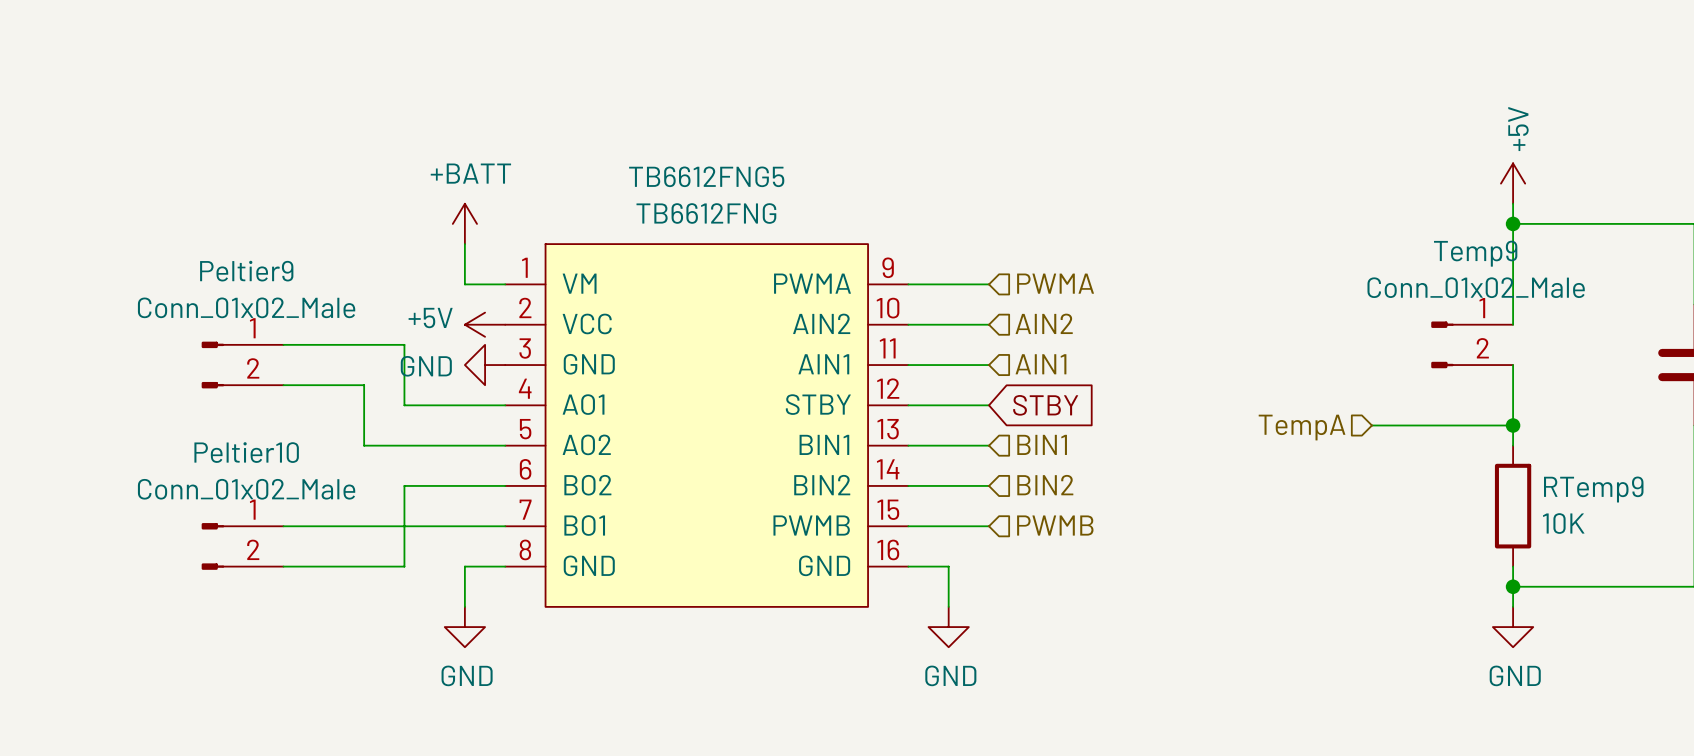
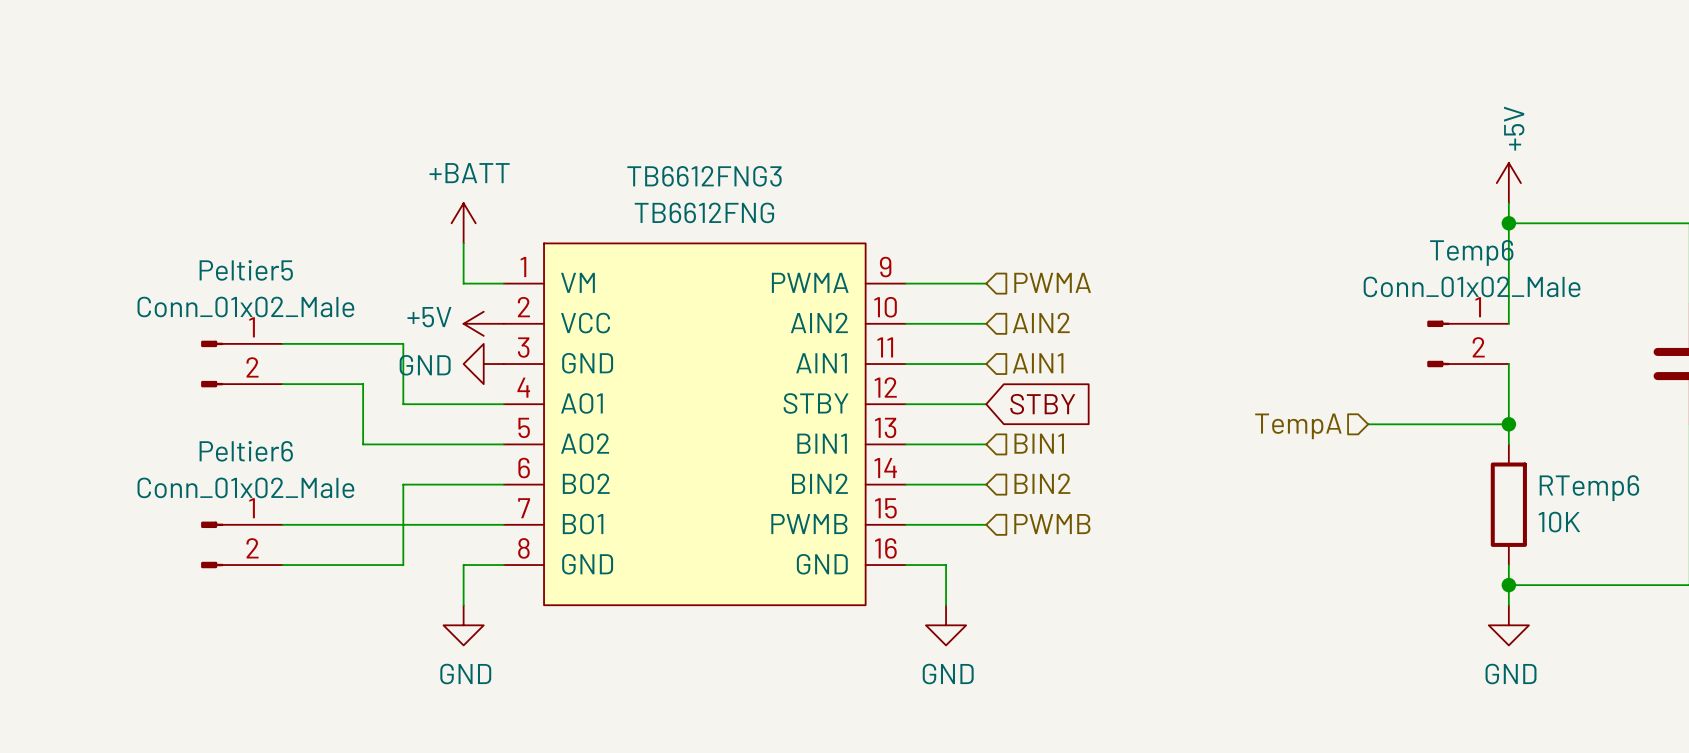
TB6612FNG5 name: TB6612FNG5 (706, 176) -> TB6612FNG3 (704, 176)
Temp9 name: Temp9 (1475, 253) -> Temp6 (1471, 252)
Peltier9 name: Peltier9 (246, 271) -> Peltier5 (246, 270)
Peltier10 name: Peltier10 (246, 452) -> Peltier6 (246, 451)
RTemp9 name: RTemp9 (1593, 489) -> RTemp6 (1589, 488)

